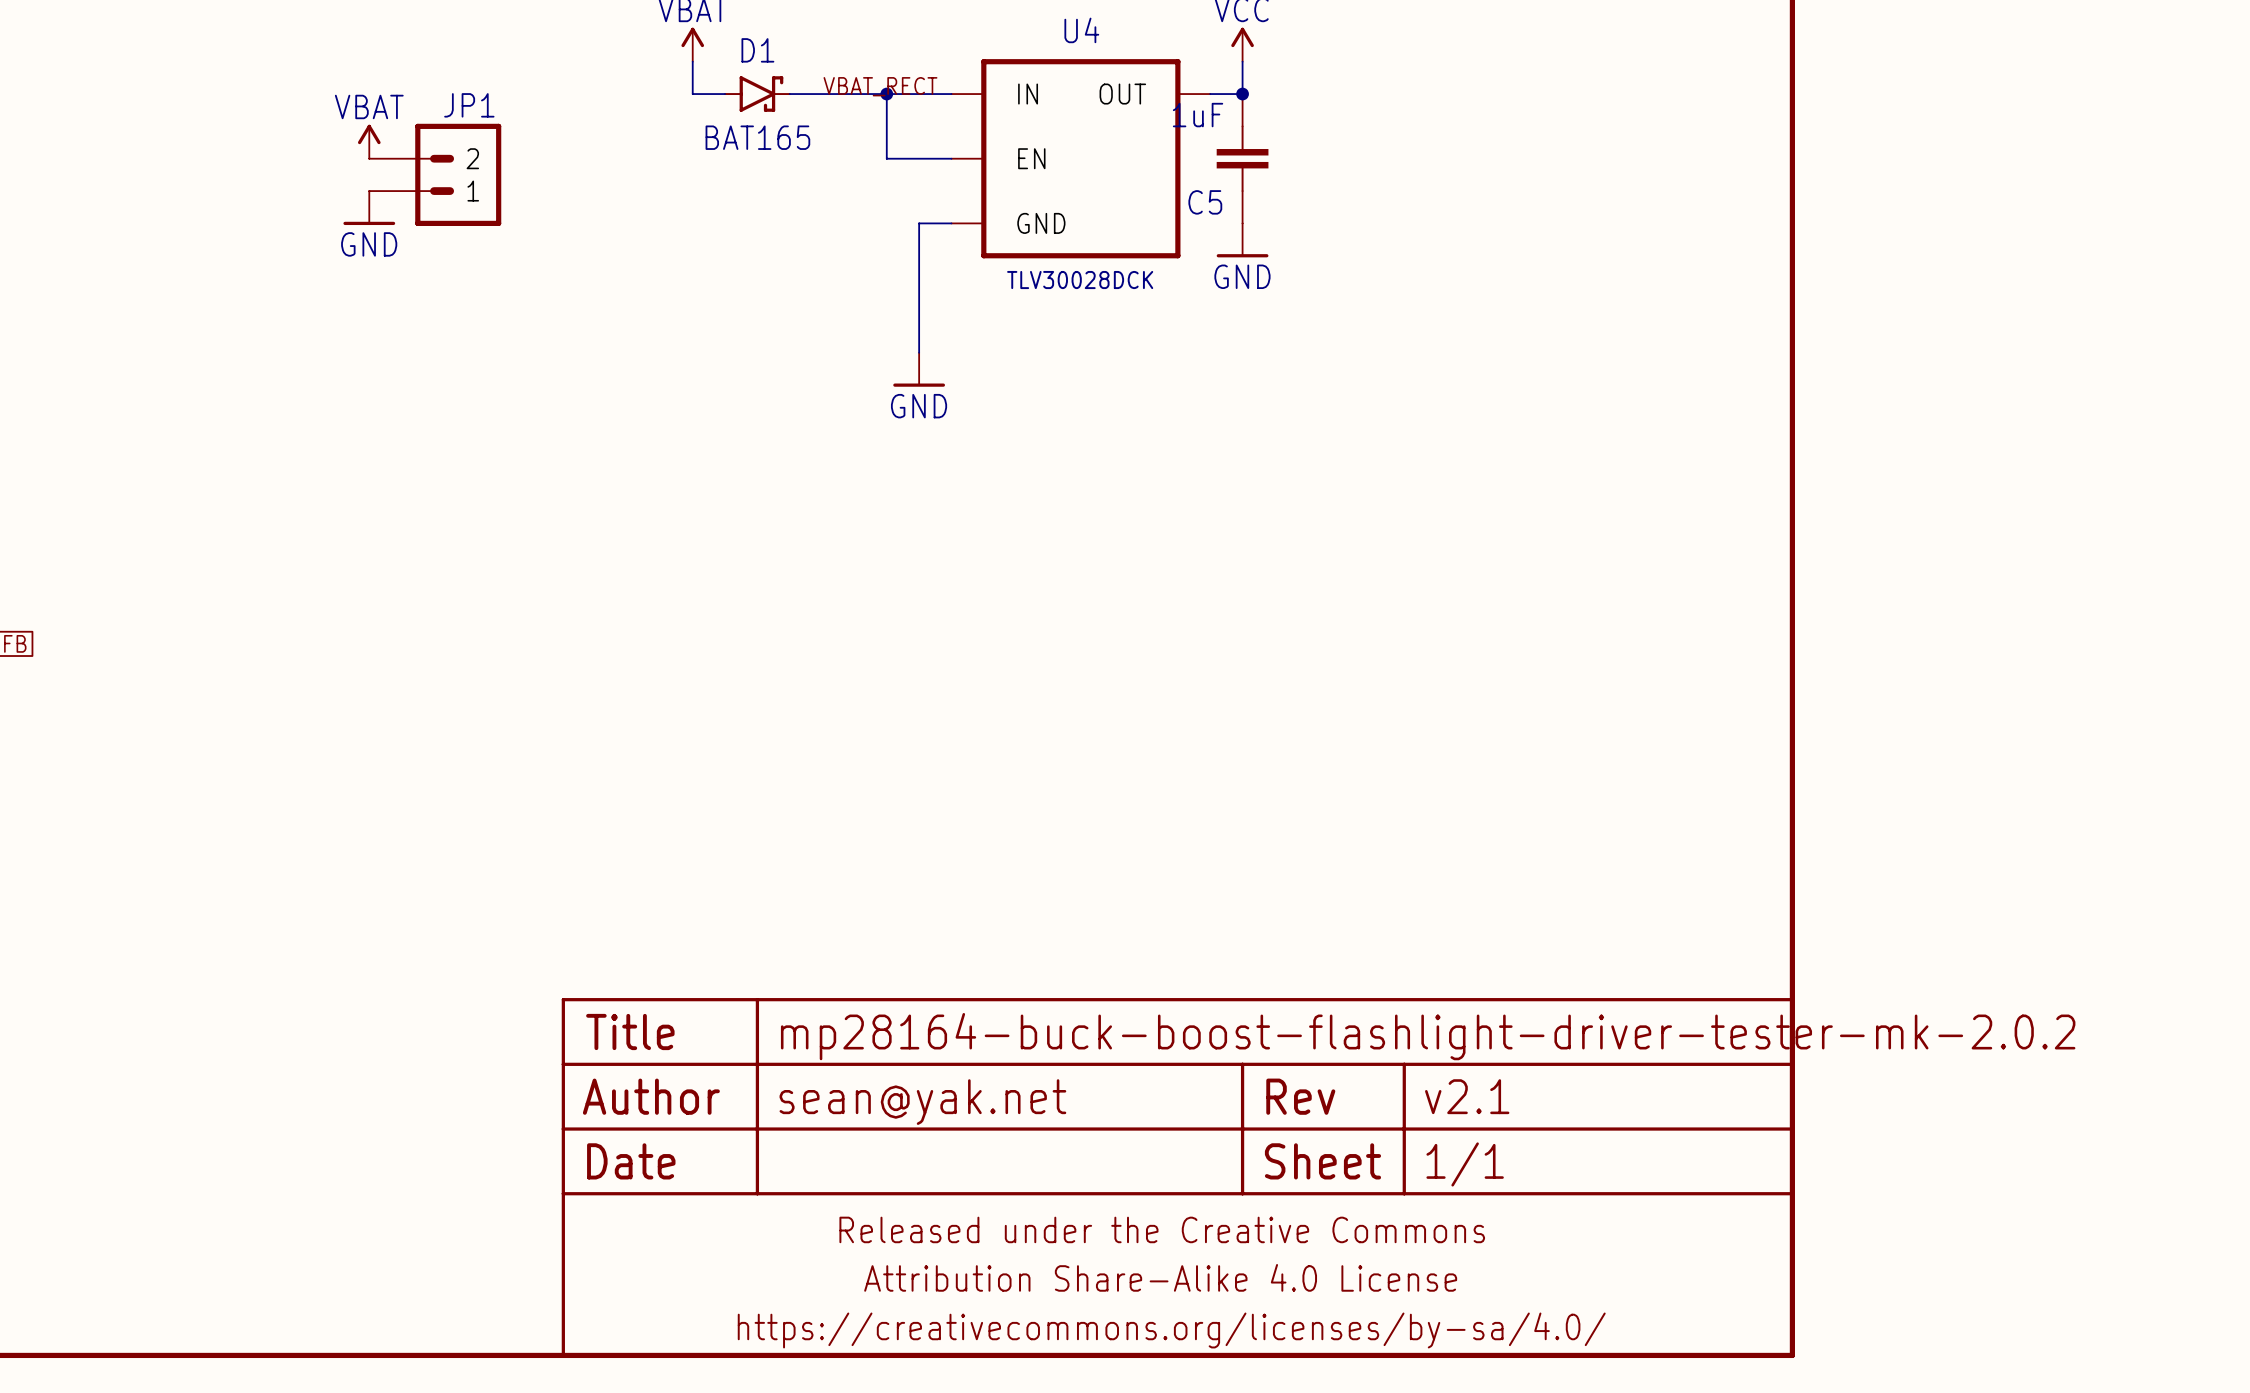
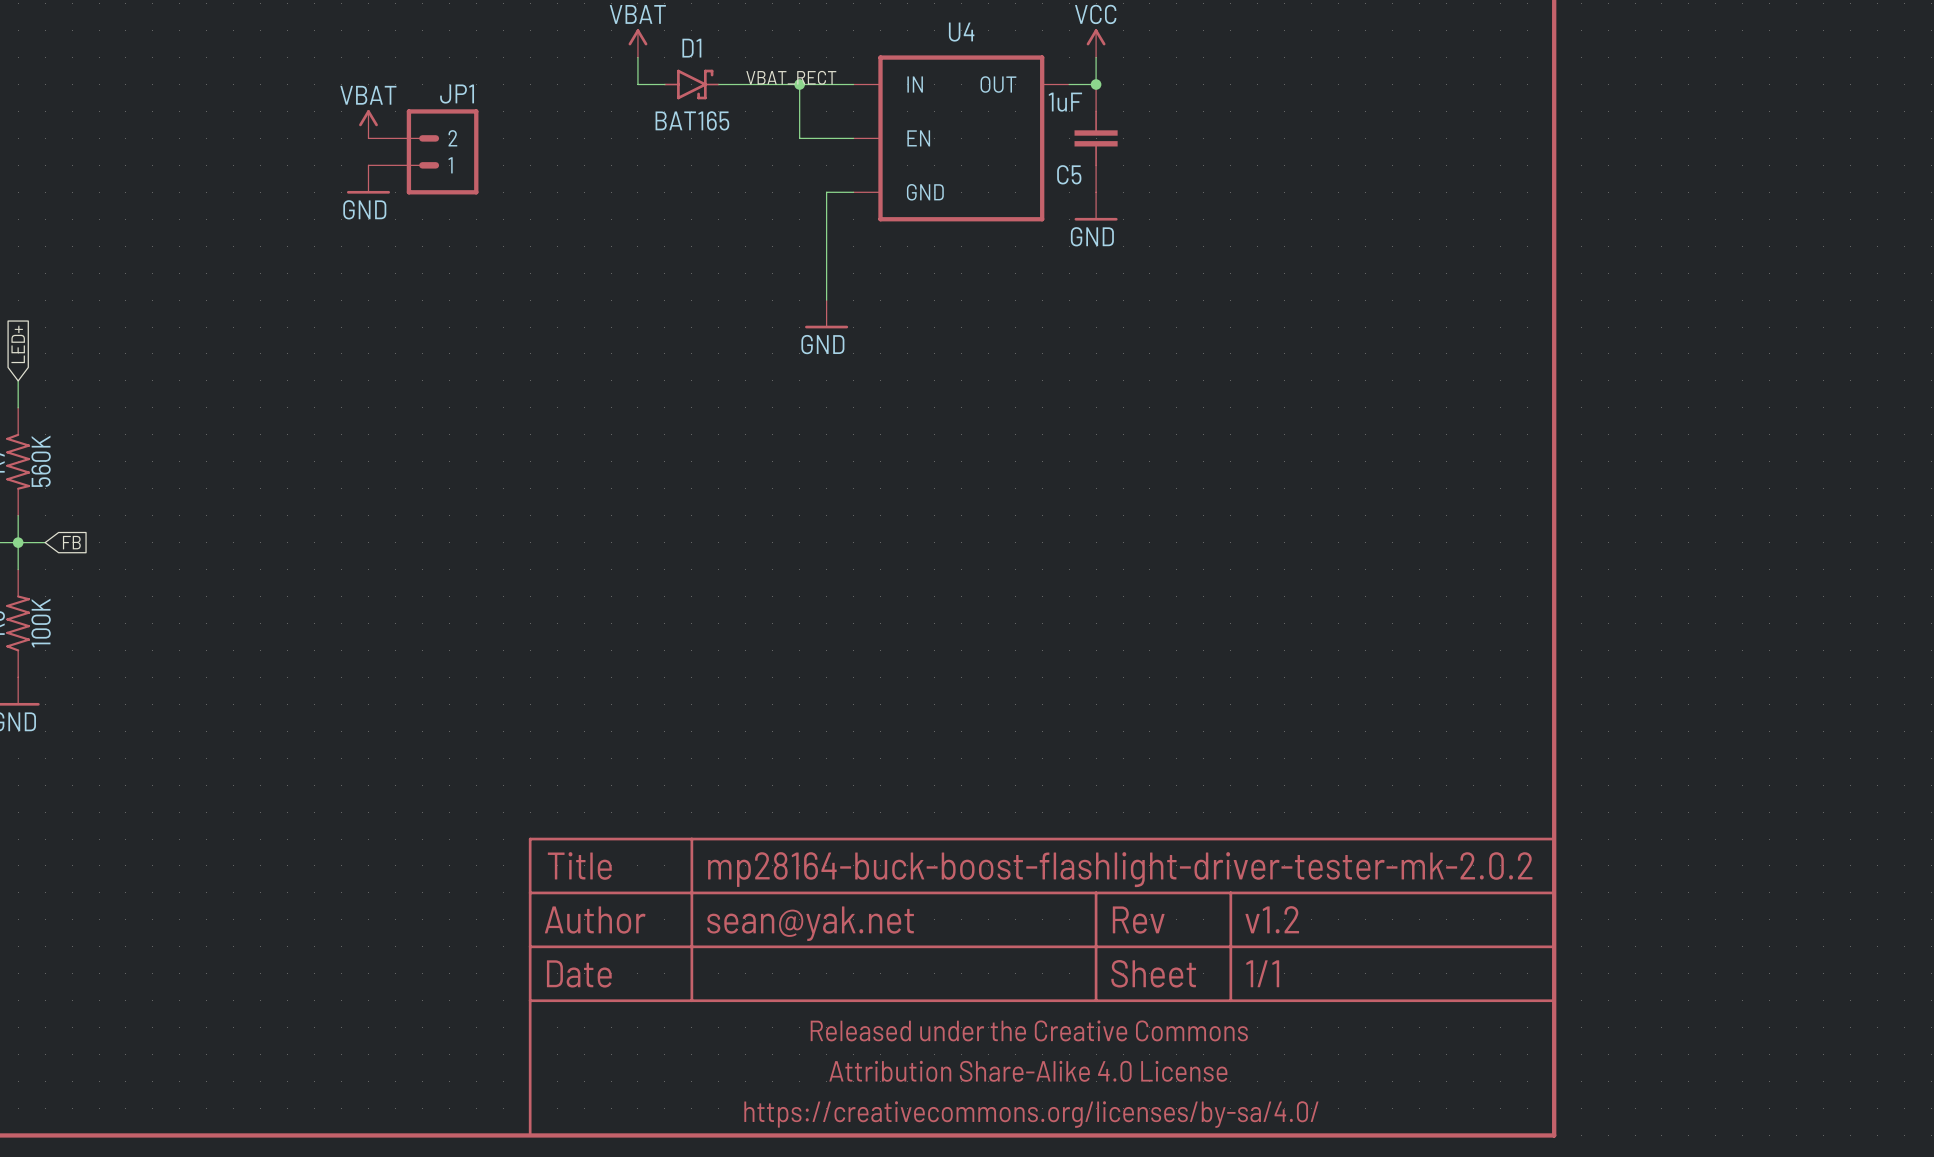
U4 value: TLV30028DCK (1080, 280) -> none
part text: v2.1 (1467, 1096) -> v1.2 (1272, 919)

